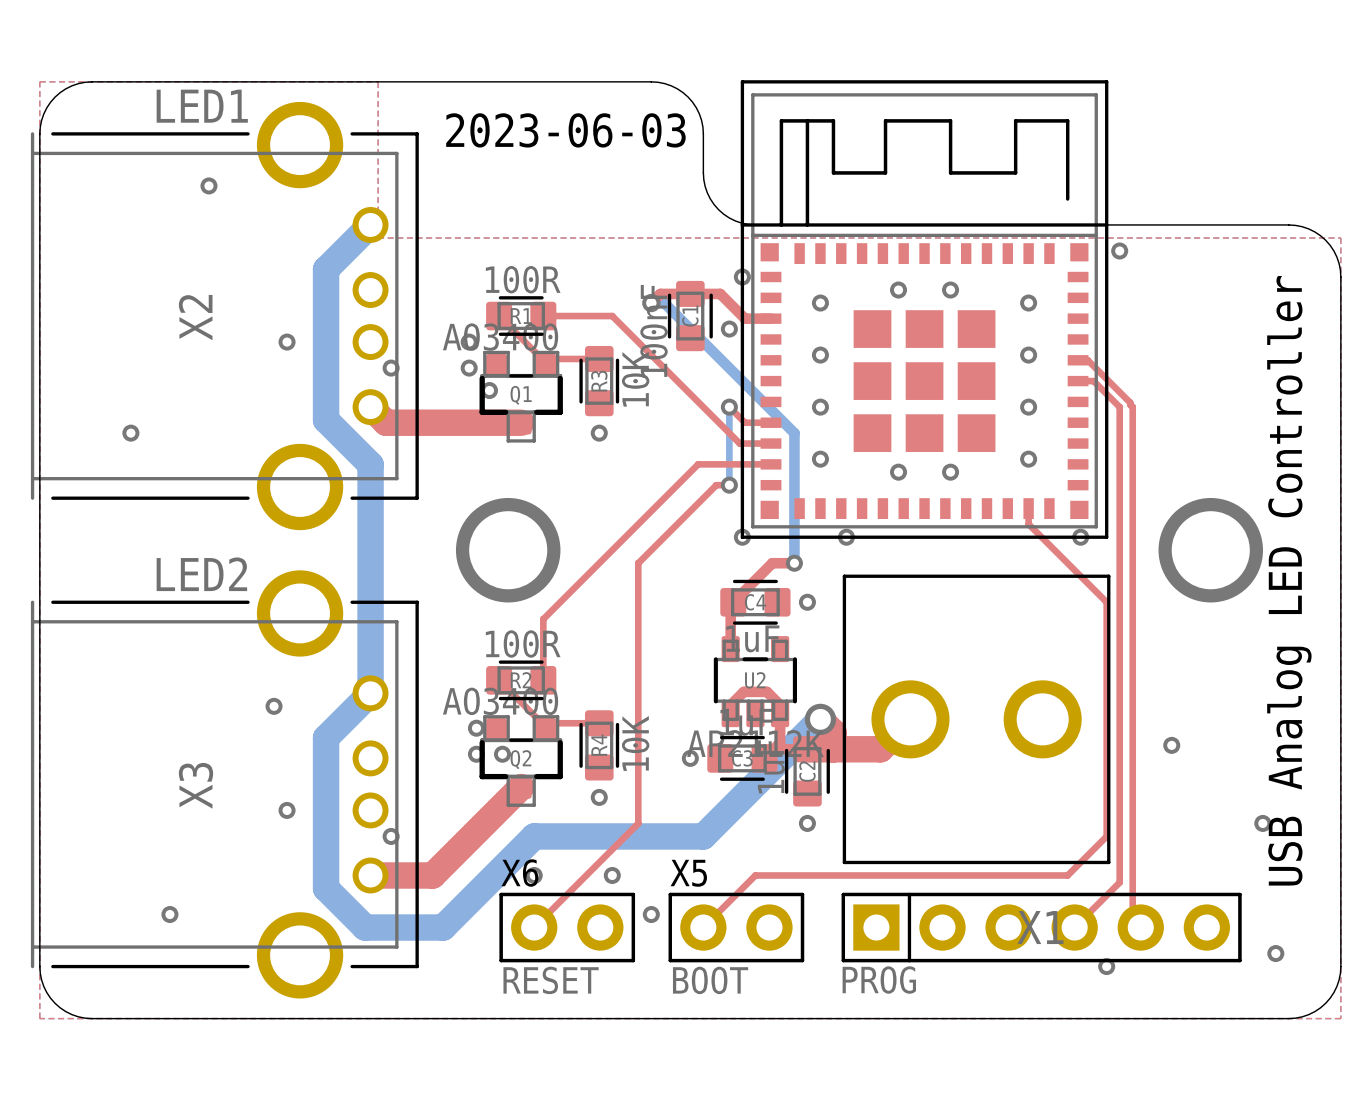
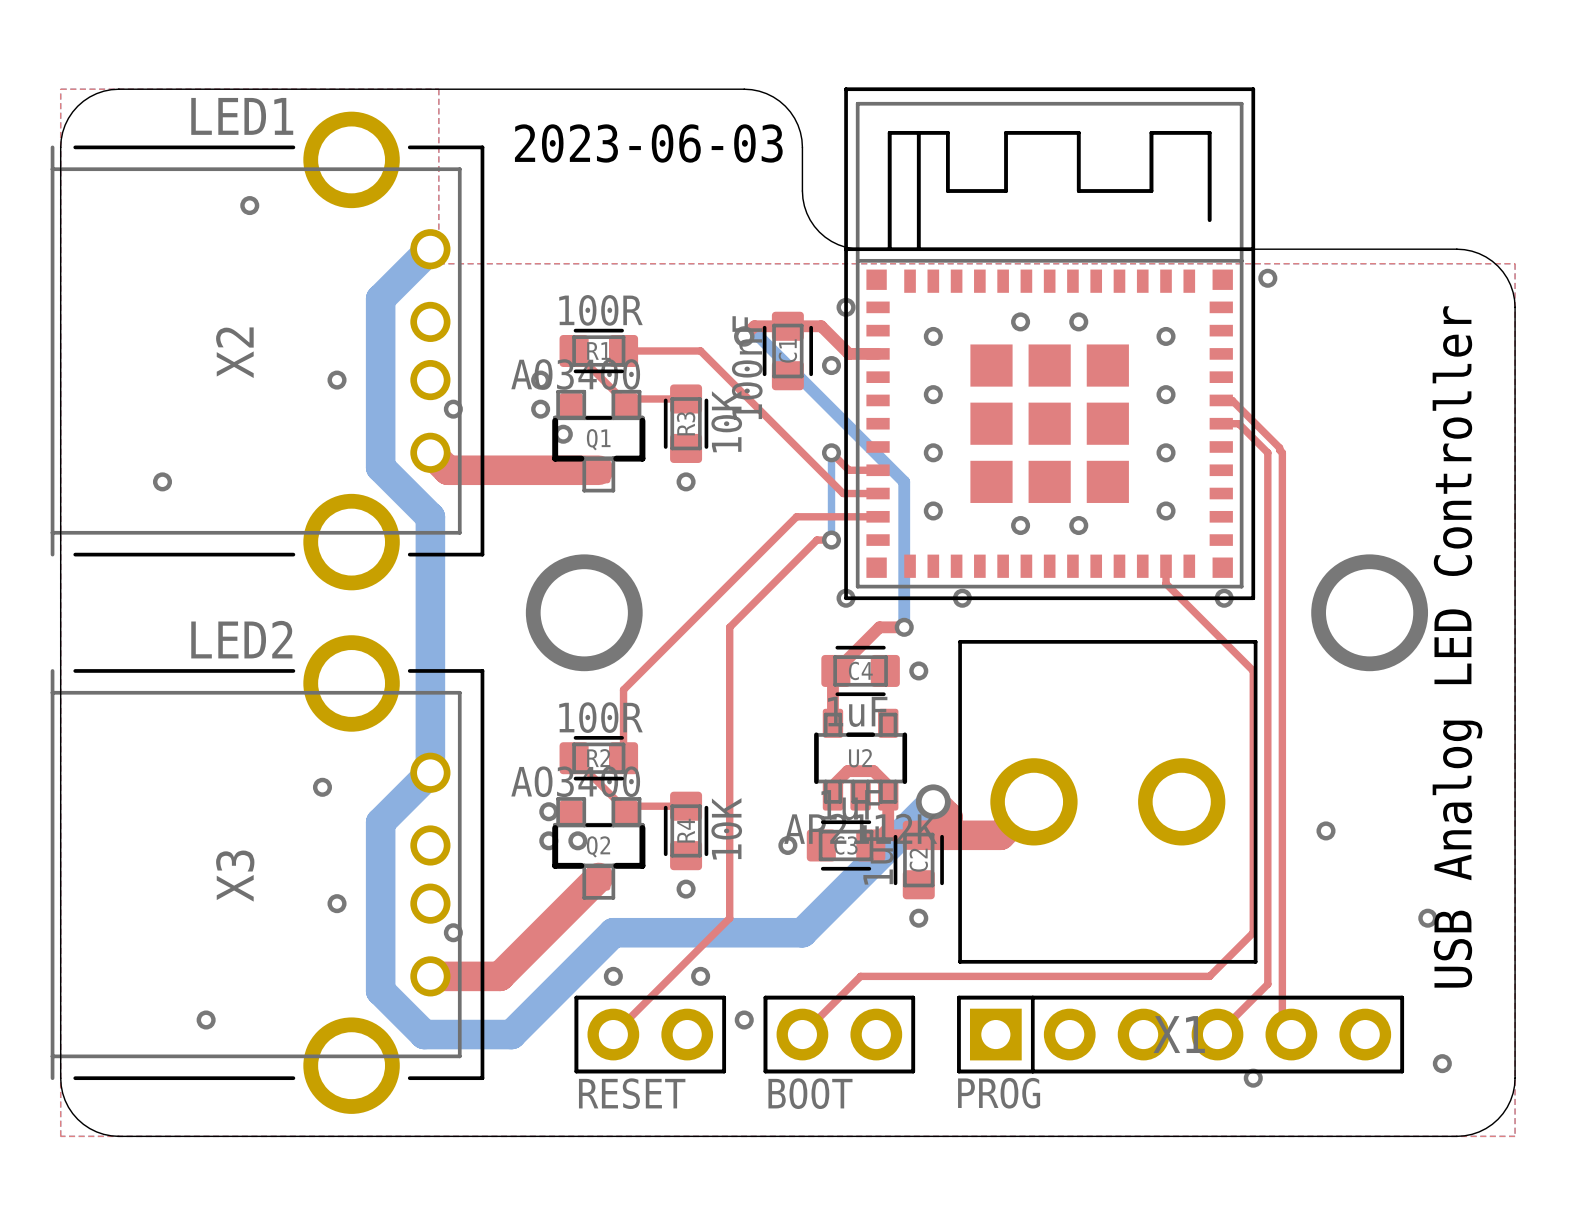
X6 name: X6 (519, 873) -> none
X5 name: X5 (688, 873) -> none

